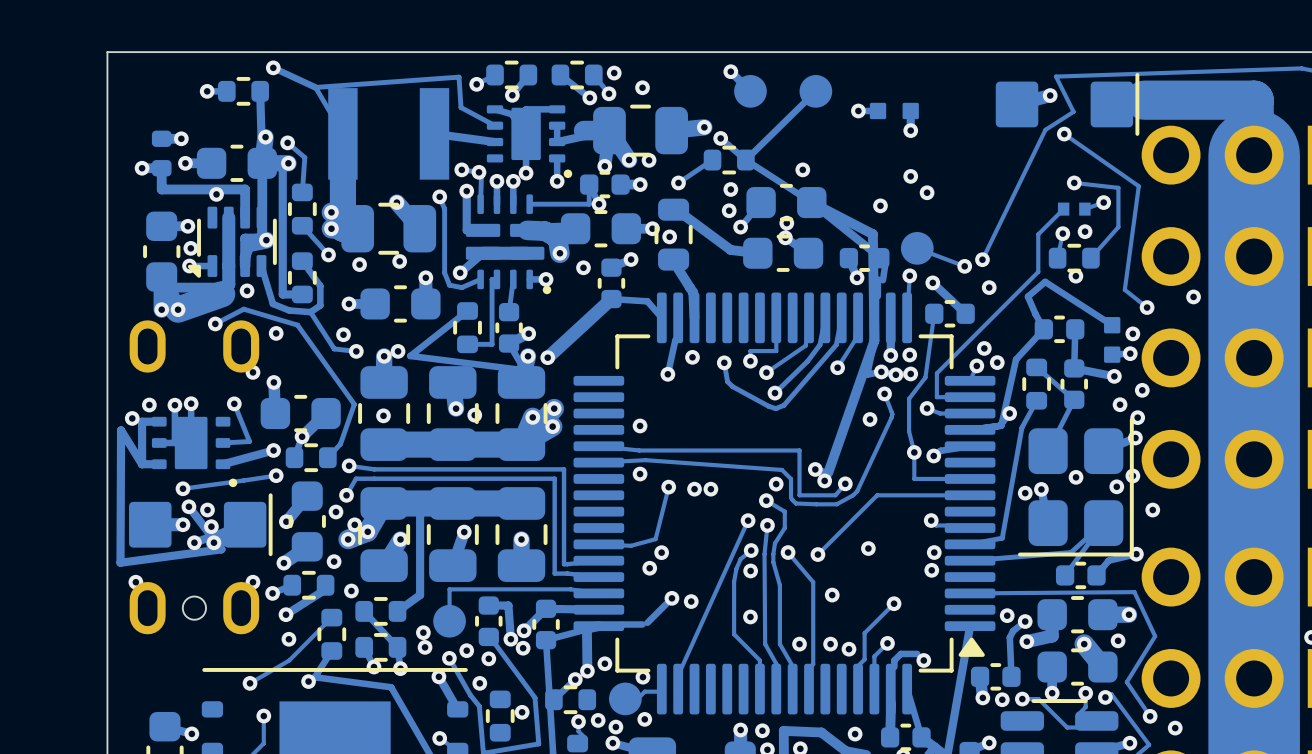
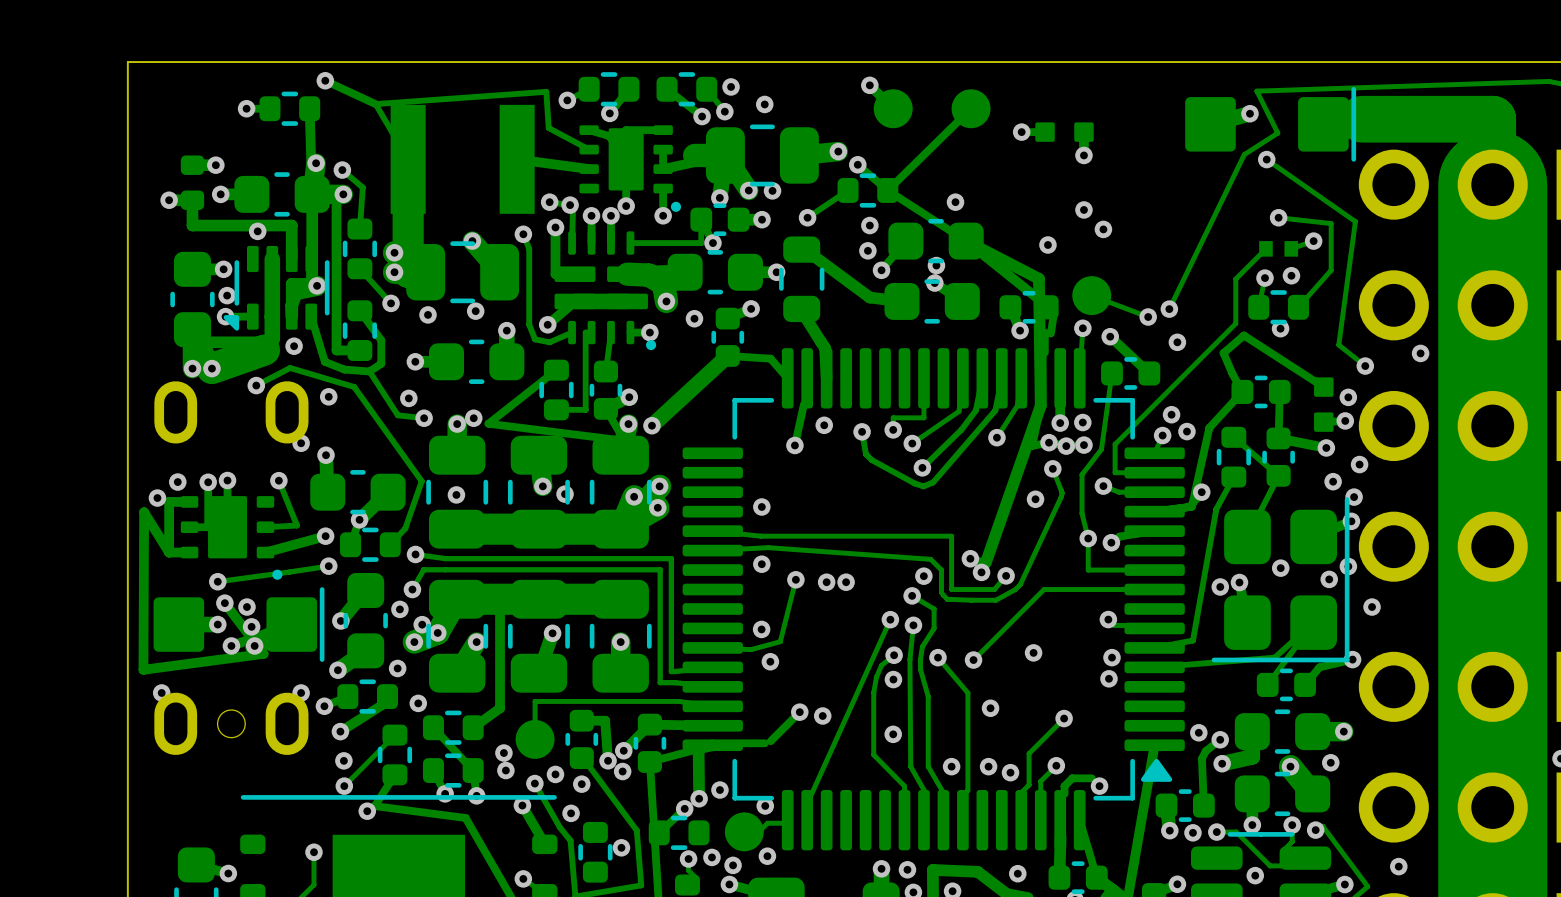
via: (669, 236) -> none
via: none -> (761, 629)
via: (661, 552) -> none
via: none -> (770, 661)
via: (649, 568) -> none
track: (970, 593) (1134, 592) (1155, 636) (1126, 682) (1150, 716) -> none
track: (289, 660) (250, 683) -> none
via position: (250, 683) -> (344, 786)
via position: (1150, 716) -> (1255, 875)

